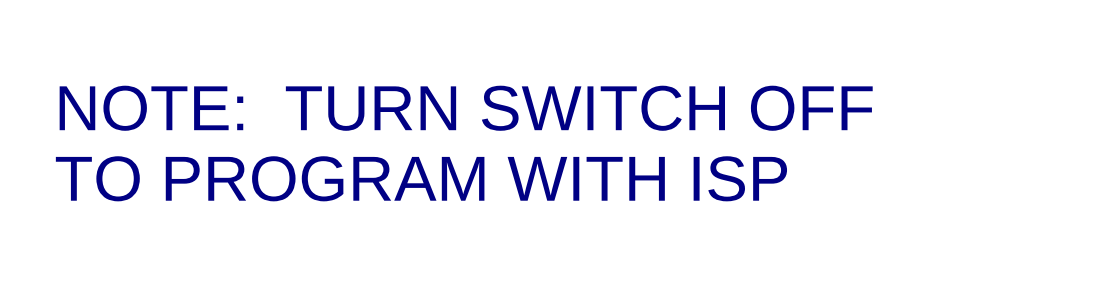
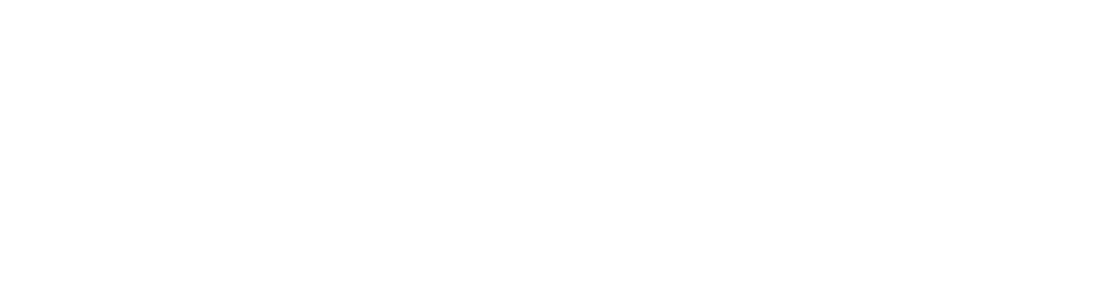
text: NOTE: TURN SWITCH OFF (466, 108) -> none
text: TO PROGRAM WITH ISP (421, 178) -> none

